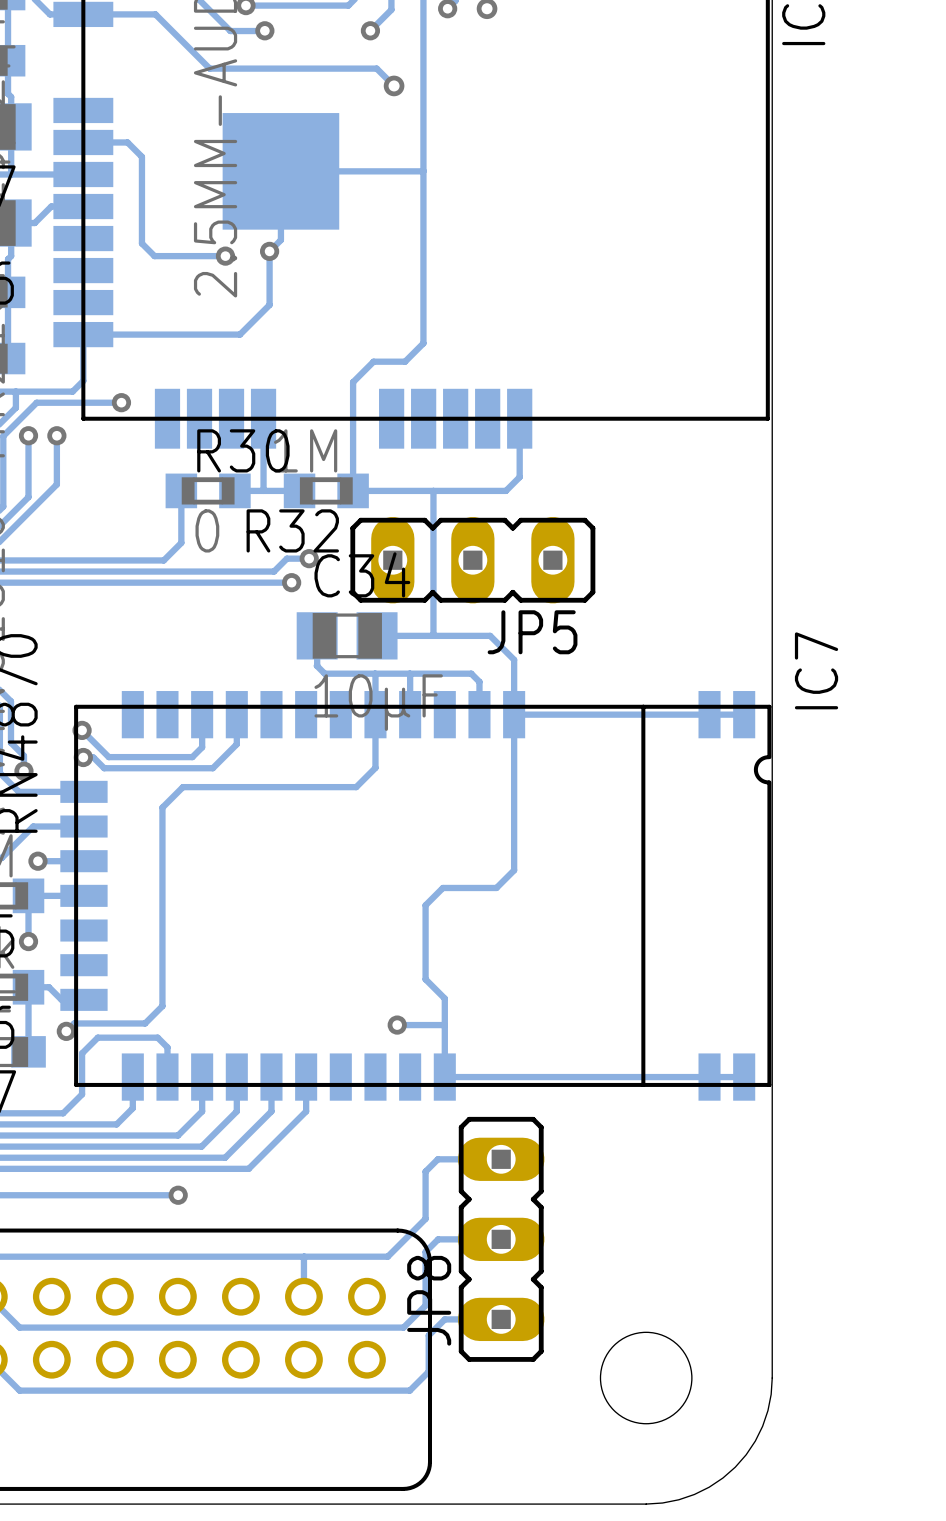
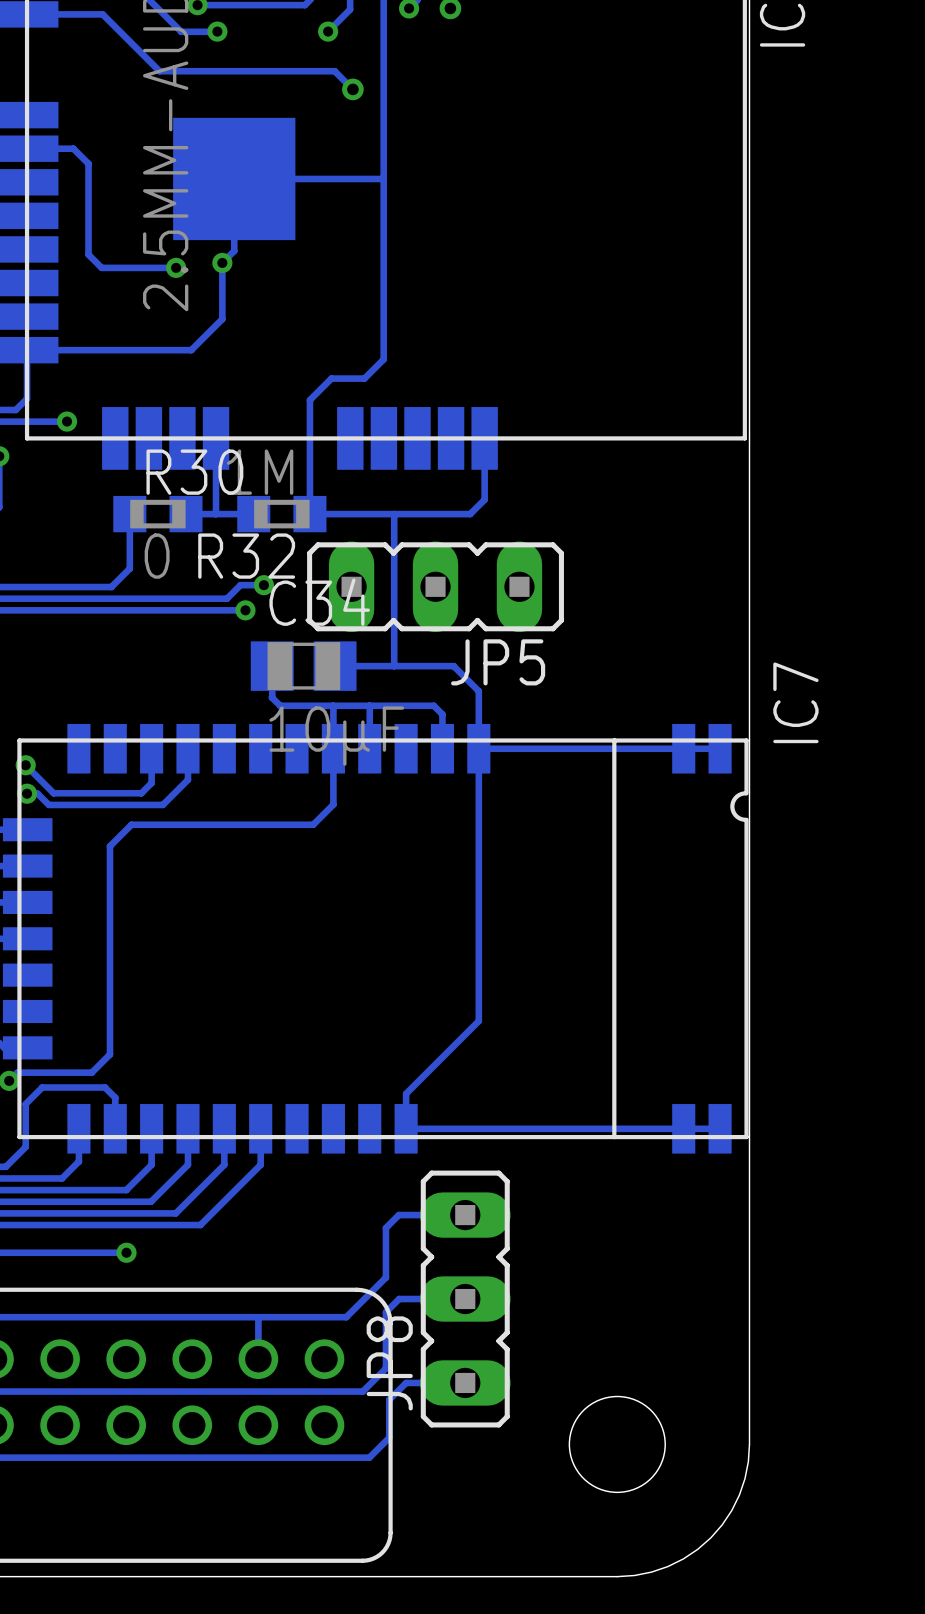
track: (514, 870) (496, 887) (442, 887) (425, 905) (425, 979) (444, 998) (444, 1043) -> (478, 912) (478, 1021) (406, 1093)
via: (397, 1025) -> none
track: (444, 1025) (397, 1025) -> none

